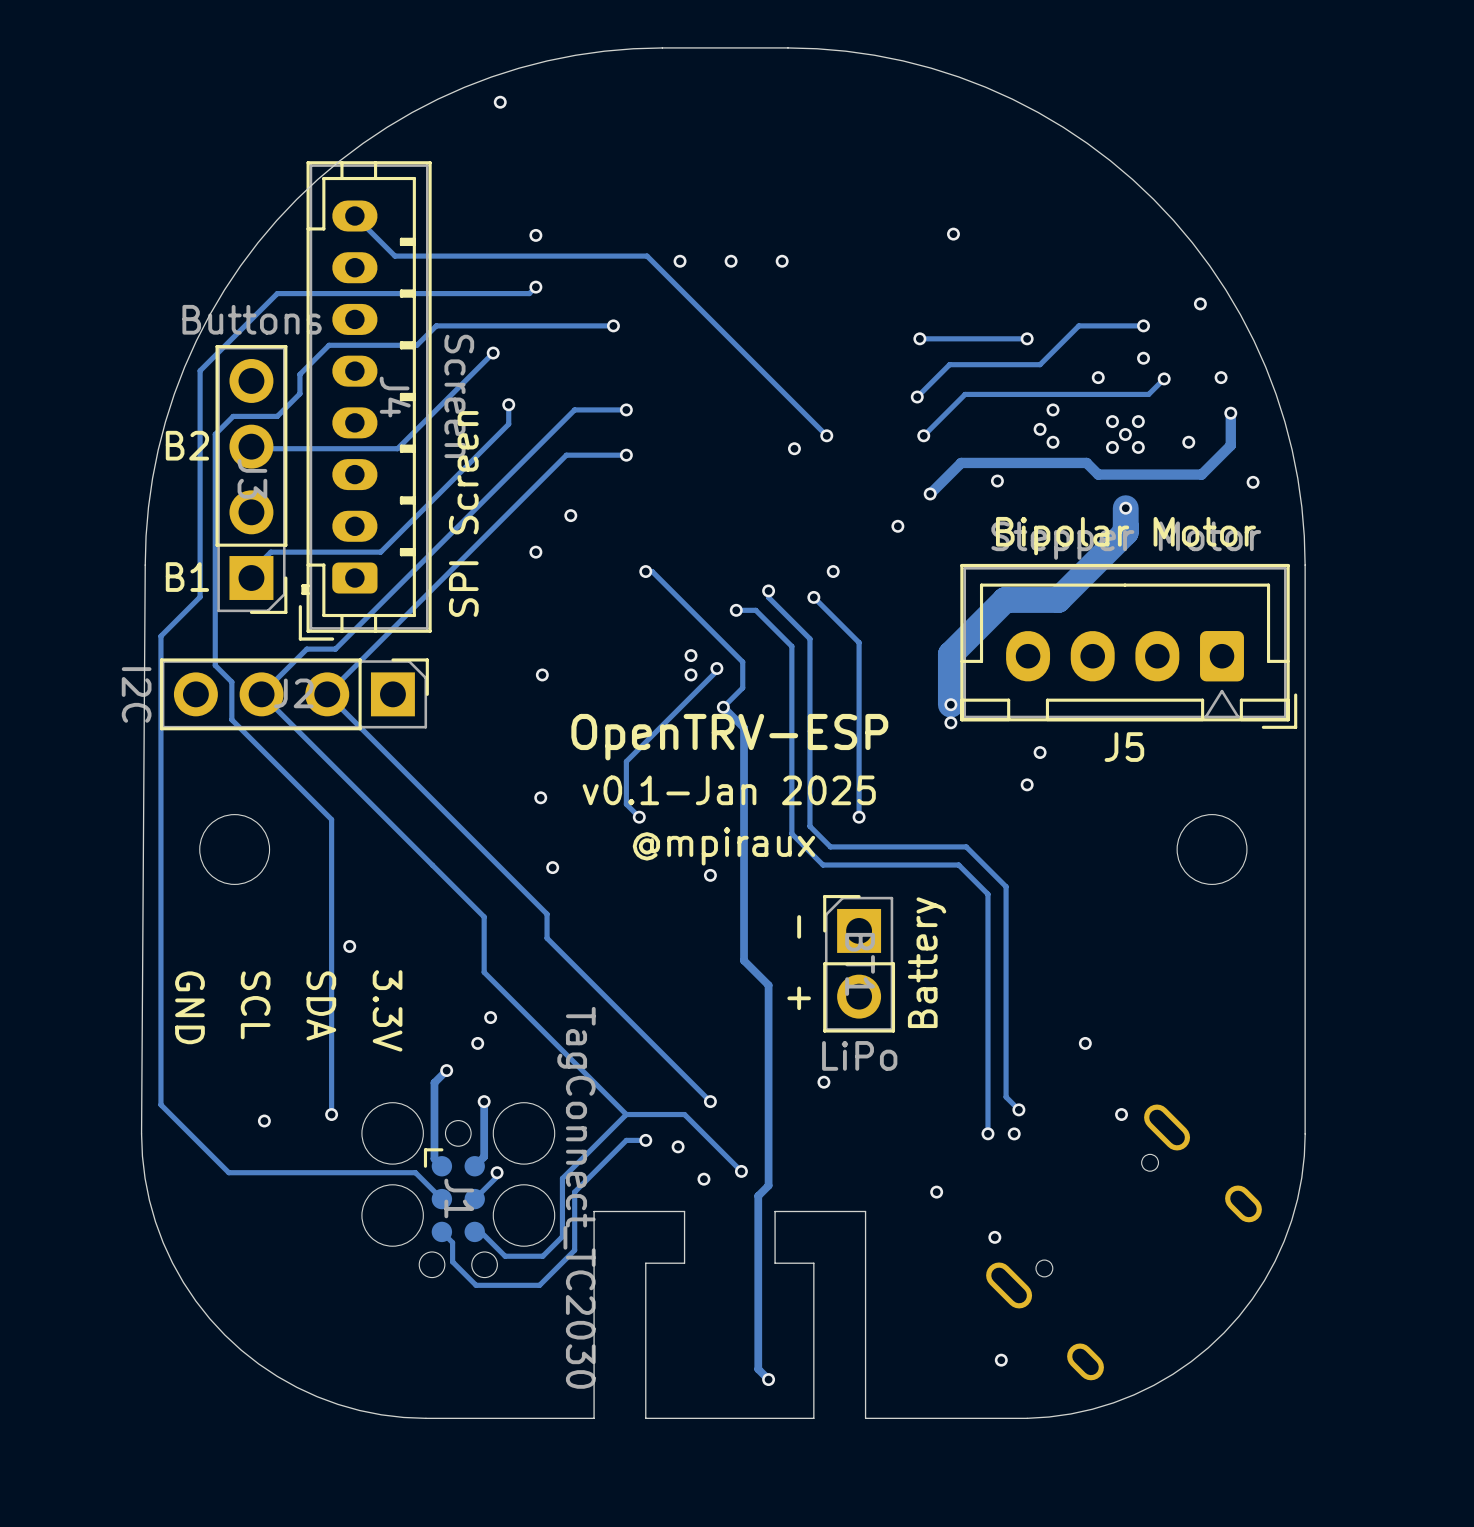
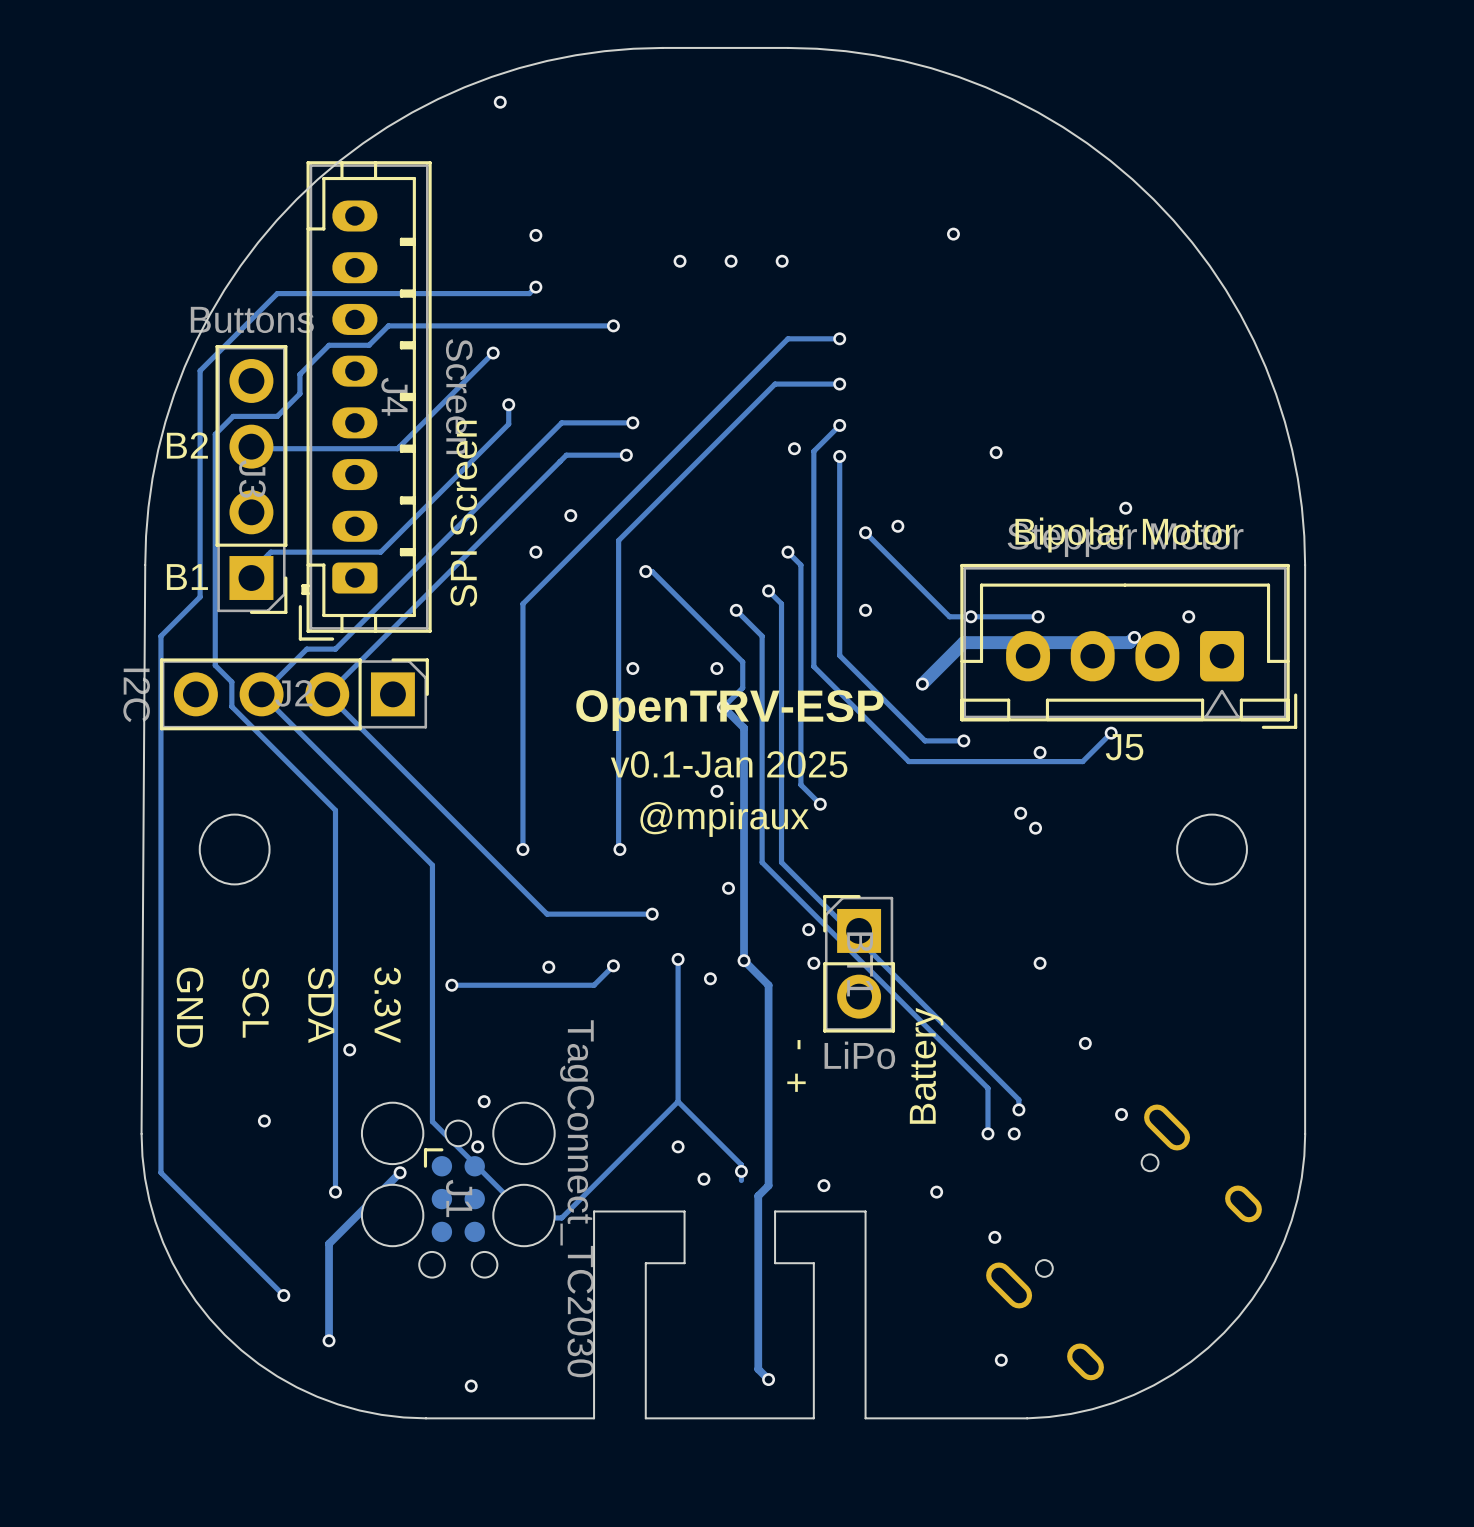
track: (354, 216) (394, 256) (647, 256) (826, 435) -> none
via: (1200, 303) -> none
track: (436, 325) (416, 345) (369, 345) -> (436, 325) (388, 325) (369, 345)
track: (1143, 325) (1078, 325) (1040, 364) (949, 364) (917, 397) -> none
via: (1143, 325) -> none
track: none -> (839, 338) (787, 338) (522, 603) (522, 849)
via: none -> (839, 338)
via: (919, 338) -> none
track: (1027, 338) (919, 338) -> none
via: (1027, 338) -> none
via: (1143, 358) -> none
via: (1098, 377) -> none
via: (1221, 377) -> none
track: (1164, 378) (1148, 394) (965, 394) (923, 435) -> none
via: (1164, 378) -> none
track: none -> (839, 384) (775, 384) (618, 540) (619, 849)
via: none -> (839, 384)
via: (917, 397) -> none
track: (626, 409) (574, 409) (561, 422) -> (632, 422) (561, 422)
via position: (626, 409) -> (632, 422)
via: (1053, 409) -> none
track: (1230, 413) (1230, 445) (1201, 474) (1098, 474) (1086, 462) (961, 462) (930, 493) -> none
via: (1230, 413) -> none
via: (1112, 421) -> none
via: (1138, 421) -> none
track: none -> (839, 425) (813, 451) (813, 666) (908, 761) (1082, 761) (1111, 733)
via: (1040, 429) -> none
via: (1125, 434) -> none
via position: (826, 435) -> (839, 425)
via: (923, 435) -> none
via: (1053, 442) -> none
via: (1188, 442) -> none
via: (1112, 447) -> none
via: (1138, 447) -> none
via: none -> (996, 452)
track: none -> (839, 456) (839, 655) (925, 740) (963, 740)
via: none -> (839, 456)
via: (997, 481) -> none
via: (1253, 482) -> none
via: (930, 493) -> none
track: (1125, 508) (1125, 532) (1058, 599) (1005, 599) (950, 654) (950, 704) -> none
track: none -> (865, 532) (949, 616) (1040, 616)
via: none -> (865, 532)
track: none -> (787, 552) (800, 565) (800, 784) (820, 804)
via: none -> (787, 552)
via: (833, 571) -> none
track: (768, 590) (768, 597) (809, 638) (809, 826) (830, 846) (966, 846) (1006, 886) (1006, 1097) (1018, 1109) -> (768, 590) (781, 603) (781, 862) (1018, 1099) (1018, 1109)
track: (813, 597) (859, 642) (859, 817) -> none
via: (813, 597) -> none
track: (736, 610) (755, 610) (791, 646) (791, 833) (823, 865) (958, 865) (987, 894) (987, 1088) -> (736, 610) (762, 636) (762, 862) (987, 1088)
via: none -> (865, 610)
via: none -> (970, 616)
via: none -> (1038, 616)
via: none -> (1188, 616)
track: none -> (1134, 637) (1129, 642) (963, 642) (922, 684)
via: none -> (1134, 637)
via: (691, 655) -> none
via: none -> (632, 668)
track: (716, 668) (716, 671) (626, 761) (626, 804) (639, 817) -> none
via: (542, 674) -> none
via: (691, 674) -> none
via: none -> (922, 684)
via: (950, 704) -> none
track: (231, 706) (231, 719) (331, 819) (331, 1114) -> (231, 706) (335, 810) (335, 1192)
via: (950, 722) -> none
via: none -> (1111, 733)
text position: OpenTRV-ESP (729, 737) -> OpenTRV-ESP (729, 710)
via: none -> (963, 740)
via: (1027, 784) -> none
text position: v0.1-Jan 2025 (729, 790) -> v0.1-Jan 2025 (729, 764)
via: none -> (716, 791)
via: (540, 797) -> none
via: none -> (1020, 813)
via: (639, 817) -> none
via position: (859, 817) -> (820, 804)
via: none -> (1035, 828)
text position: @mpiraux (723, 846) -> @mpiraux (724, 819)
via: none -> (522, 849)
via: none -> (619, 849)
track: (432, 865) (484, 916) (484, 972) (626, 1114) -> (432, 865) (432, 1121) (522, 1212) (522, 1217) (561, 1217) (678, 1101)
via: (552, 867) -> none
via position: (710, 875) -> (728, 888)
track: (547, 914) (547, 938) (710, 1101) -> (547, 914) (652, 914)
via: none -> (652, 914)
via: none -> (808, 929)
via: (349, 946) -> none
track: none -> (678, 959) (678, 1101)
via: none -> (678, 959)
via: none -> (744, 960)
text position: + - (799, 962) -> + - (796, 1065)
text position: Battery (927, 962) -> Battery (926, 1065)
via: none -> (813, 963)
via: none -> (1040, 963)
track: none -> (613, 965) (594, 985) (451, 985)
via: none -> (613, 965)
via: none -> (548, 967)
via: none -> (710, 978)
via: none -> (451, 985)
via: (490, 1017) -> none
via: (477, 1043) -> none
via: none -> (349, 1049)
track: (446, 1070) (434, 1082) (434, 1158) (441, 1166) -> none
via: (446, 1070) -> none
via: (823, 1082) -> none
track: (484, 1101) (484, 1156) (474, 1166) -> none
track: none -> (678, 1101) (741, 1164) (741, 1180)
via: (710, 1101) -> none
track: (160, 1104) (228, 1172) (415, 1172) (441, 1199) -> (160, 1104) (160, 1172) (283, 1295)
via: (331, 1114) -> none
track: (626, 1114) (684, 1114) (741, 1171) -> none
track: (626, 1114) (562, 1178) (562, 1236) (542, 1256) (505, 1256) (480, 1231) (474, 1231) -> none
track: (645, 1140) (626, 1140) (574, 1192) (574, 1250) (539, 1285) (476, 1285) (452, 1261) (452, 1242) (441, 1231) -> none
via: (645, 1140) -> none
via: none -> (477, 1146)
track: none -> (400, 1172) (329, 1243) (329, 1340)
via: none -> (400, 1172)
track: (497, 1172) (497, 1176) (474, 1199) -> none
via: (497, 1172) -> none
via: none -> (823, 1185)
via: none -> (335, 1192)
via: none -> (283, 1295)
via: none -> (329, 1340)
via: none -> (471, 1386)

